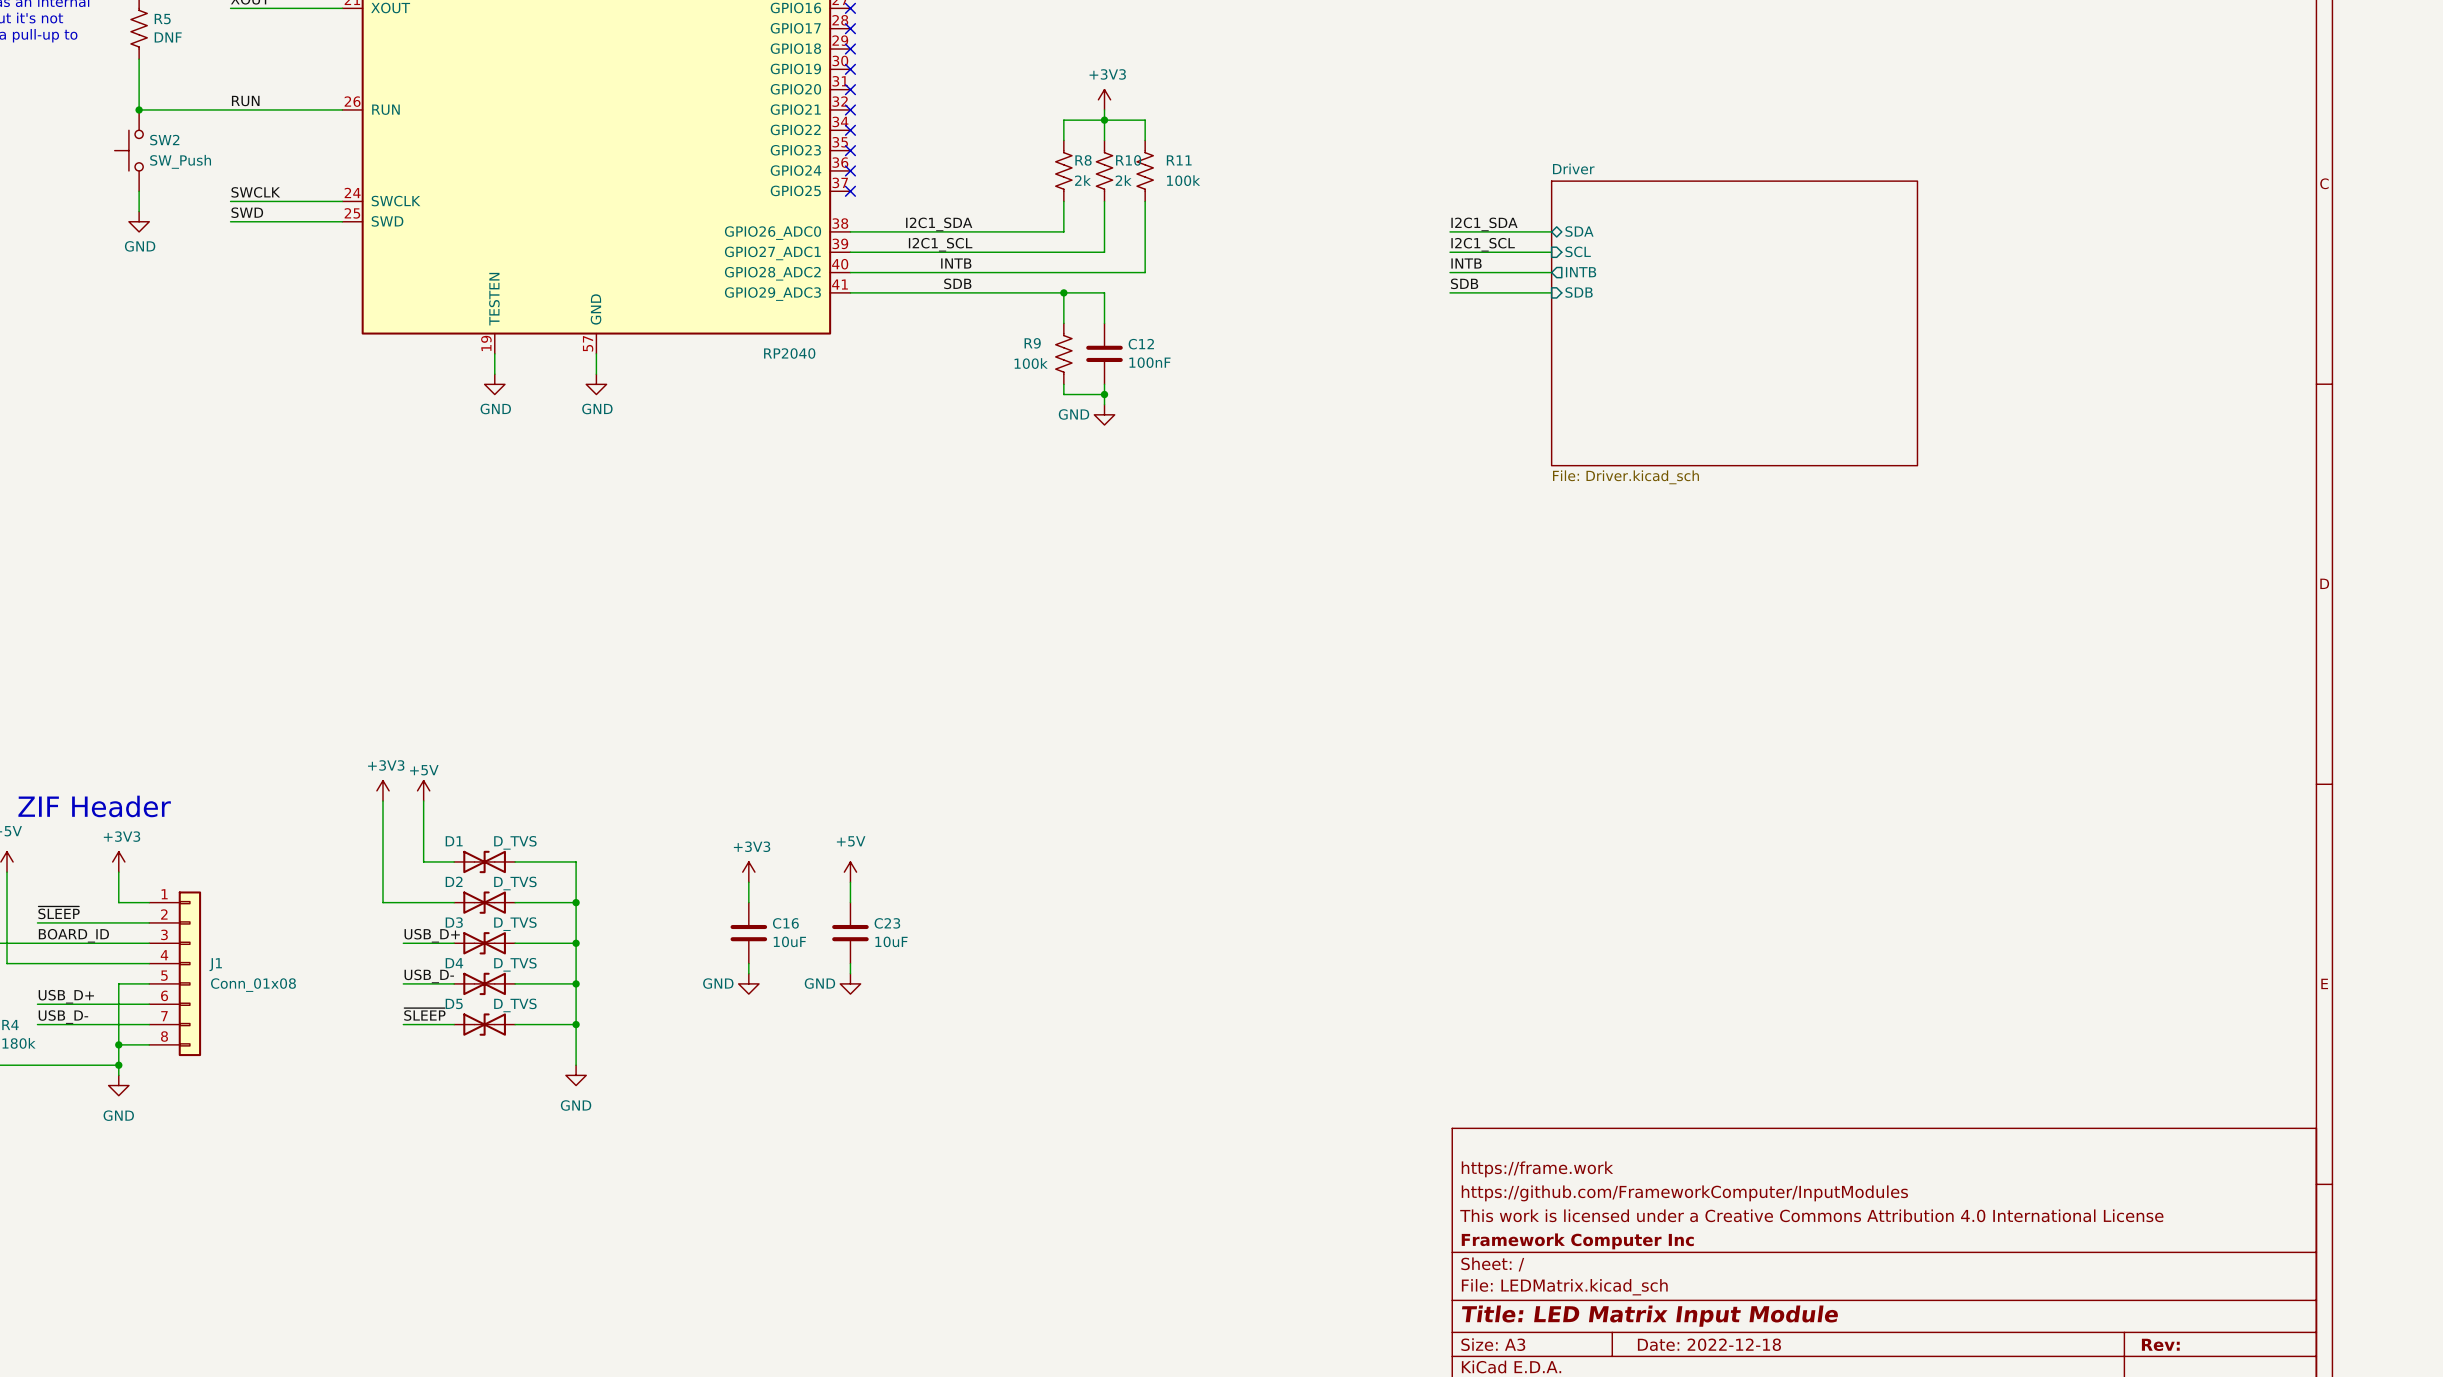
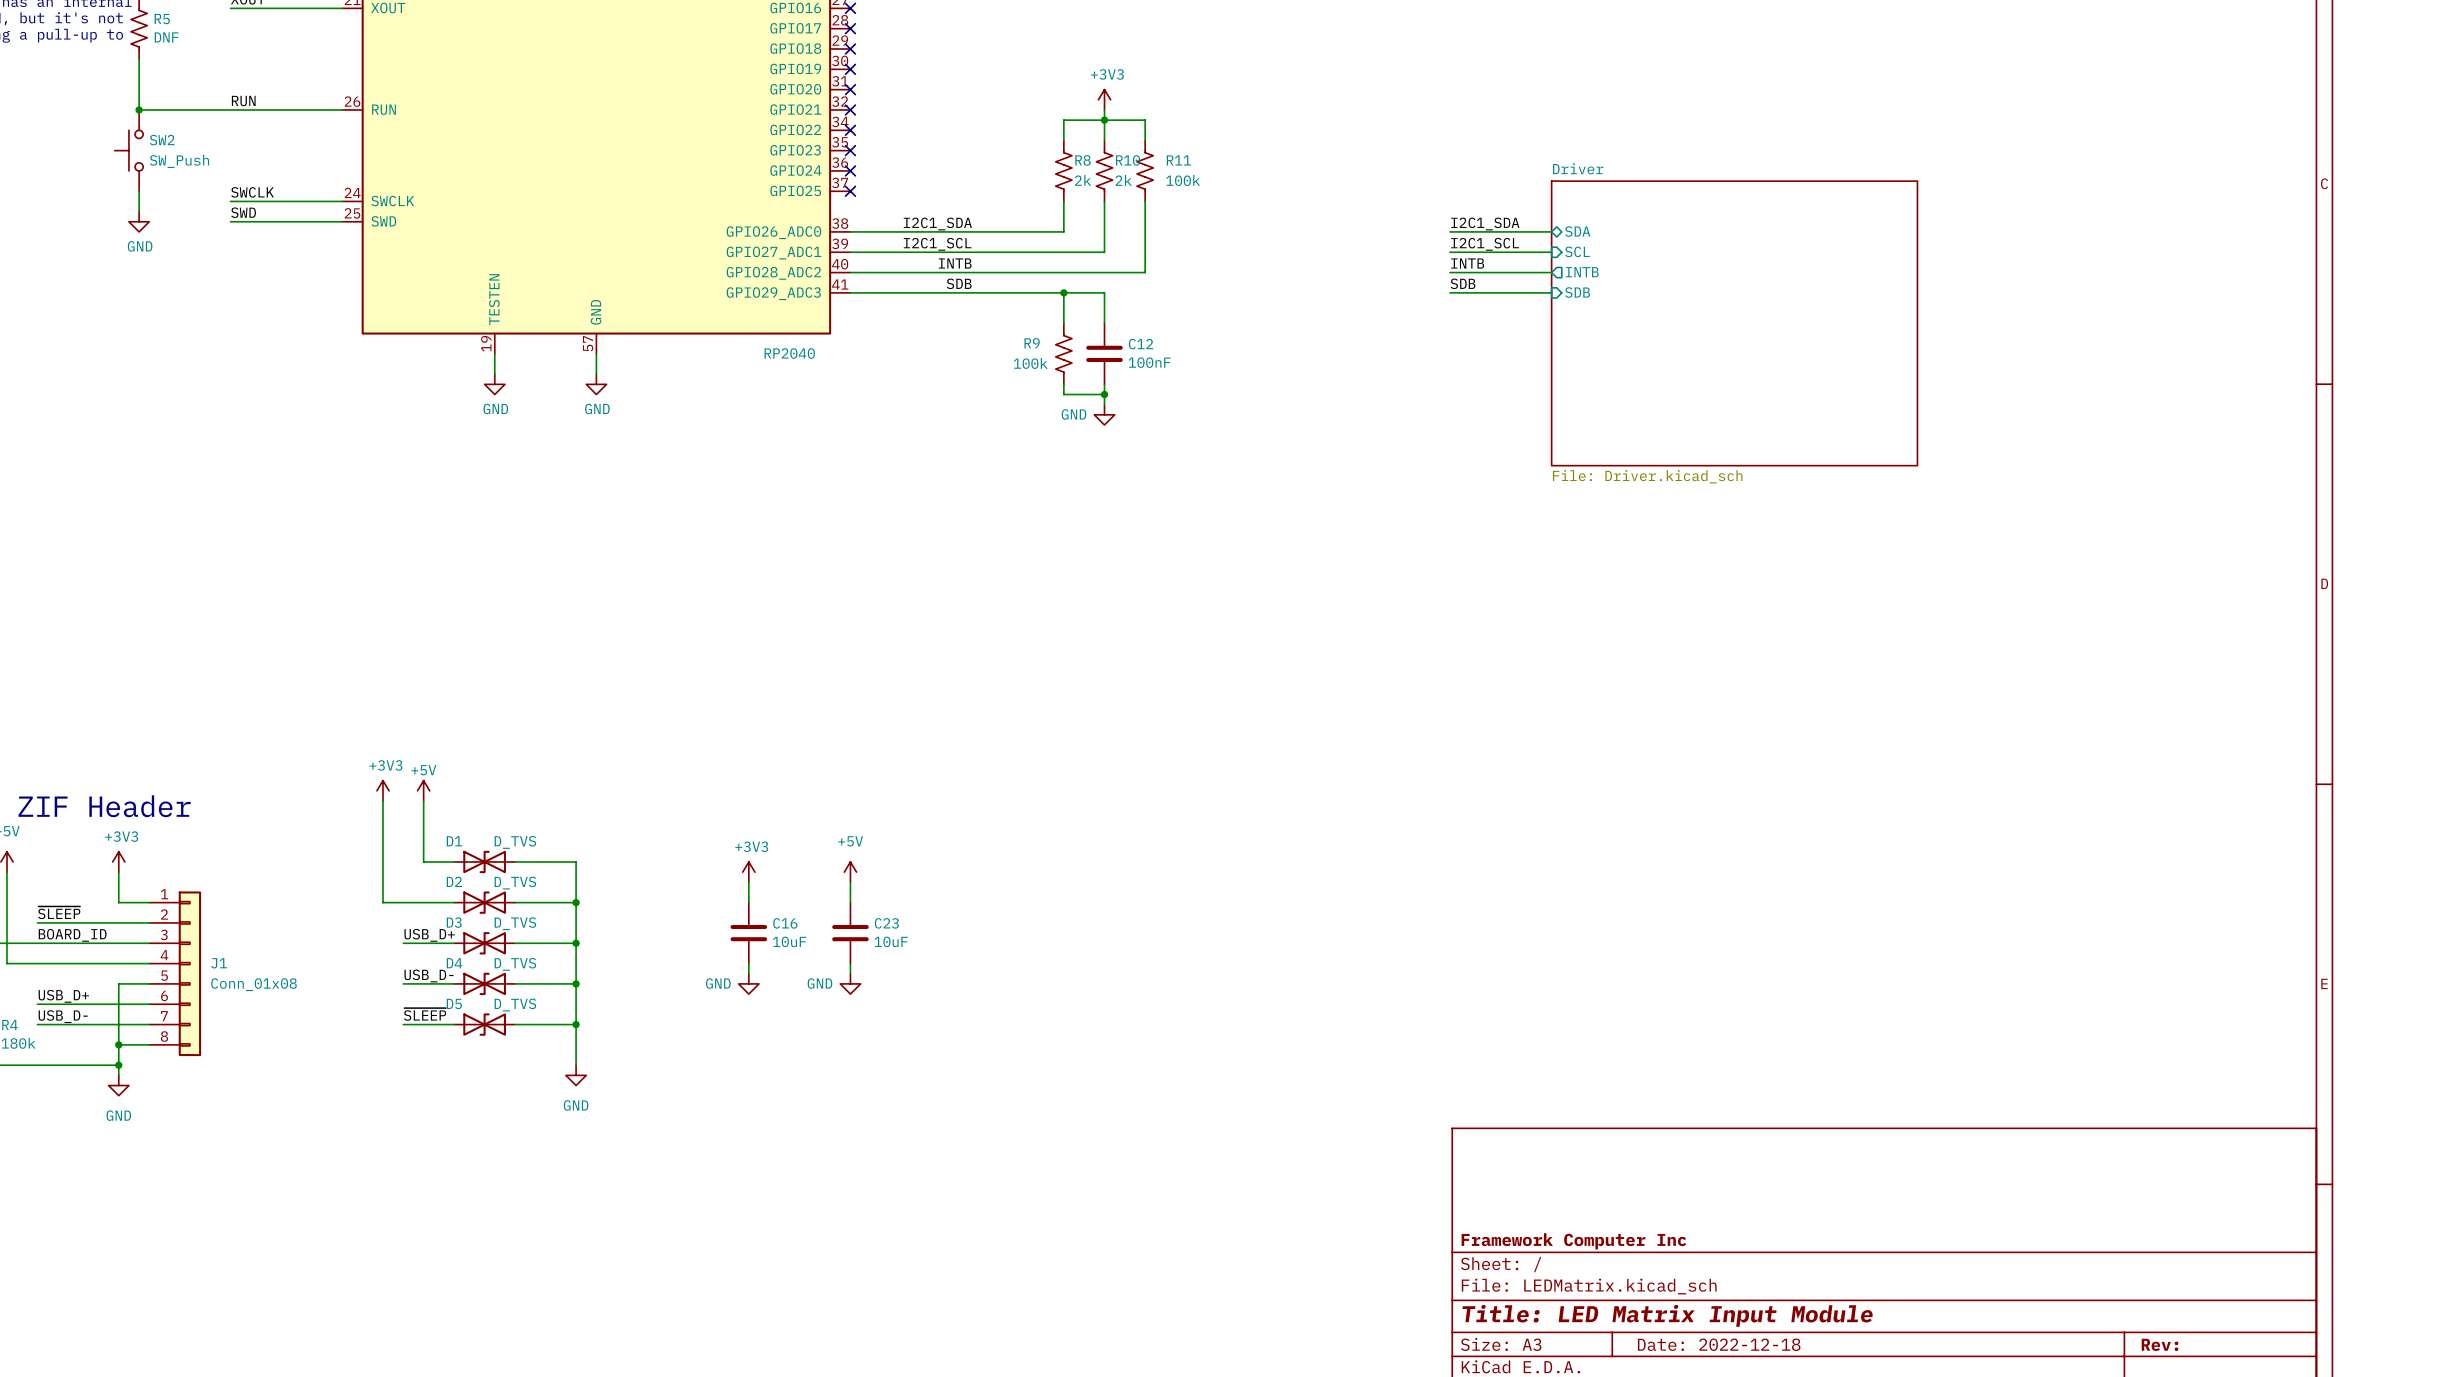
title block: https://frame.work (1537, 1169) -> none
title block: https://github.com/FrameworkComputer/InputModules (1684, 1193) -> none
title block: This work is licensed under a Creative Commons Attribution 4.0 International License (1811, 1215) -> none

